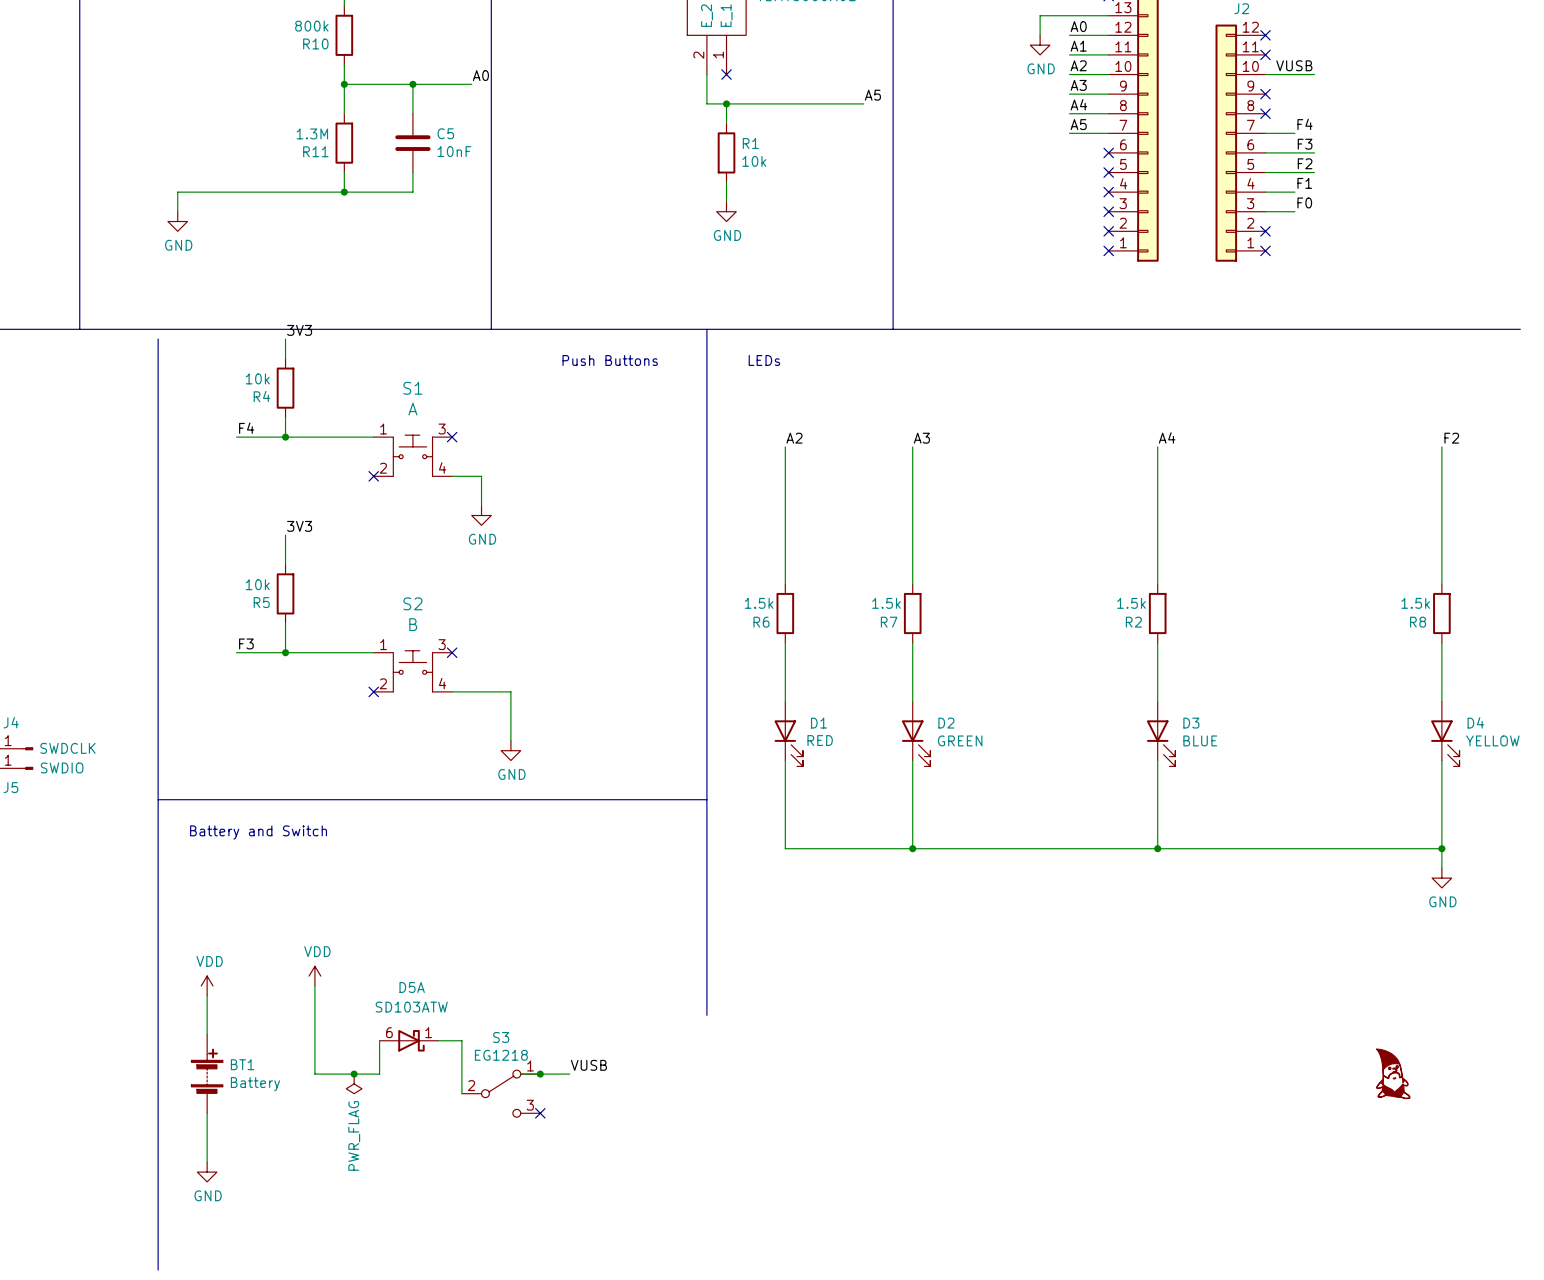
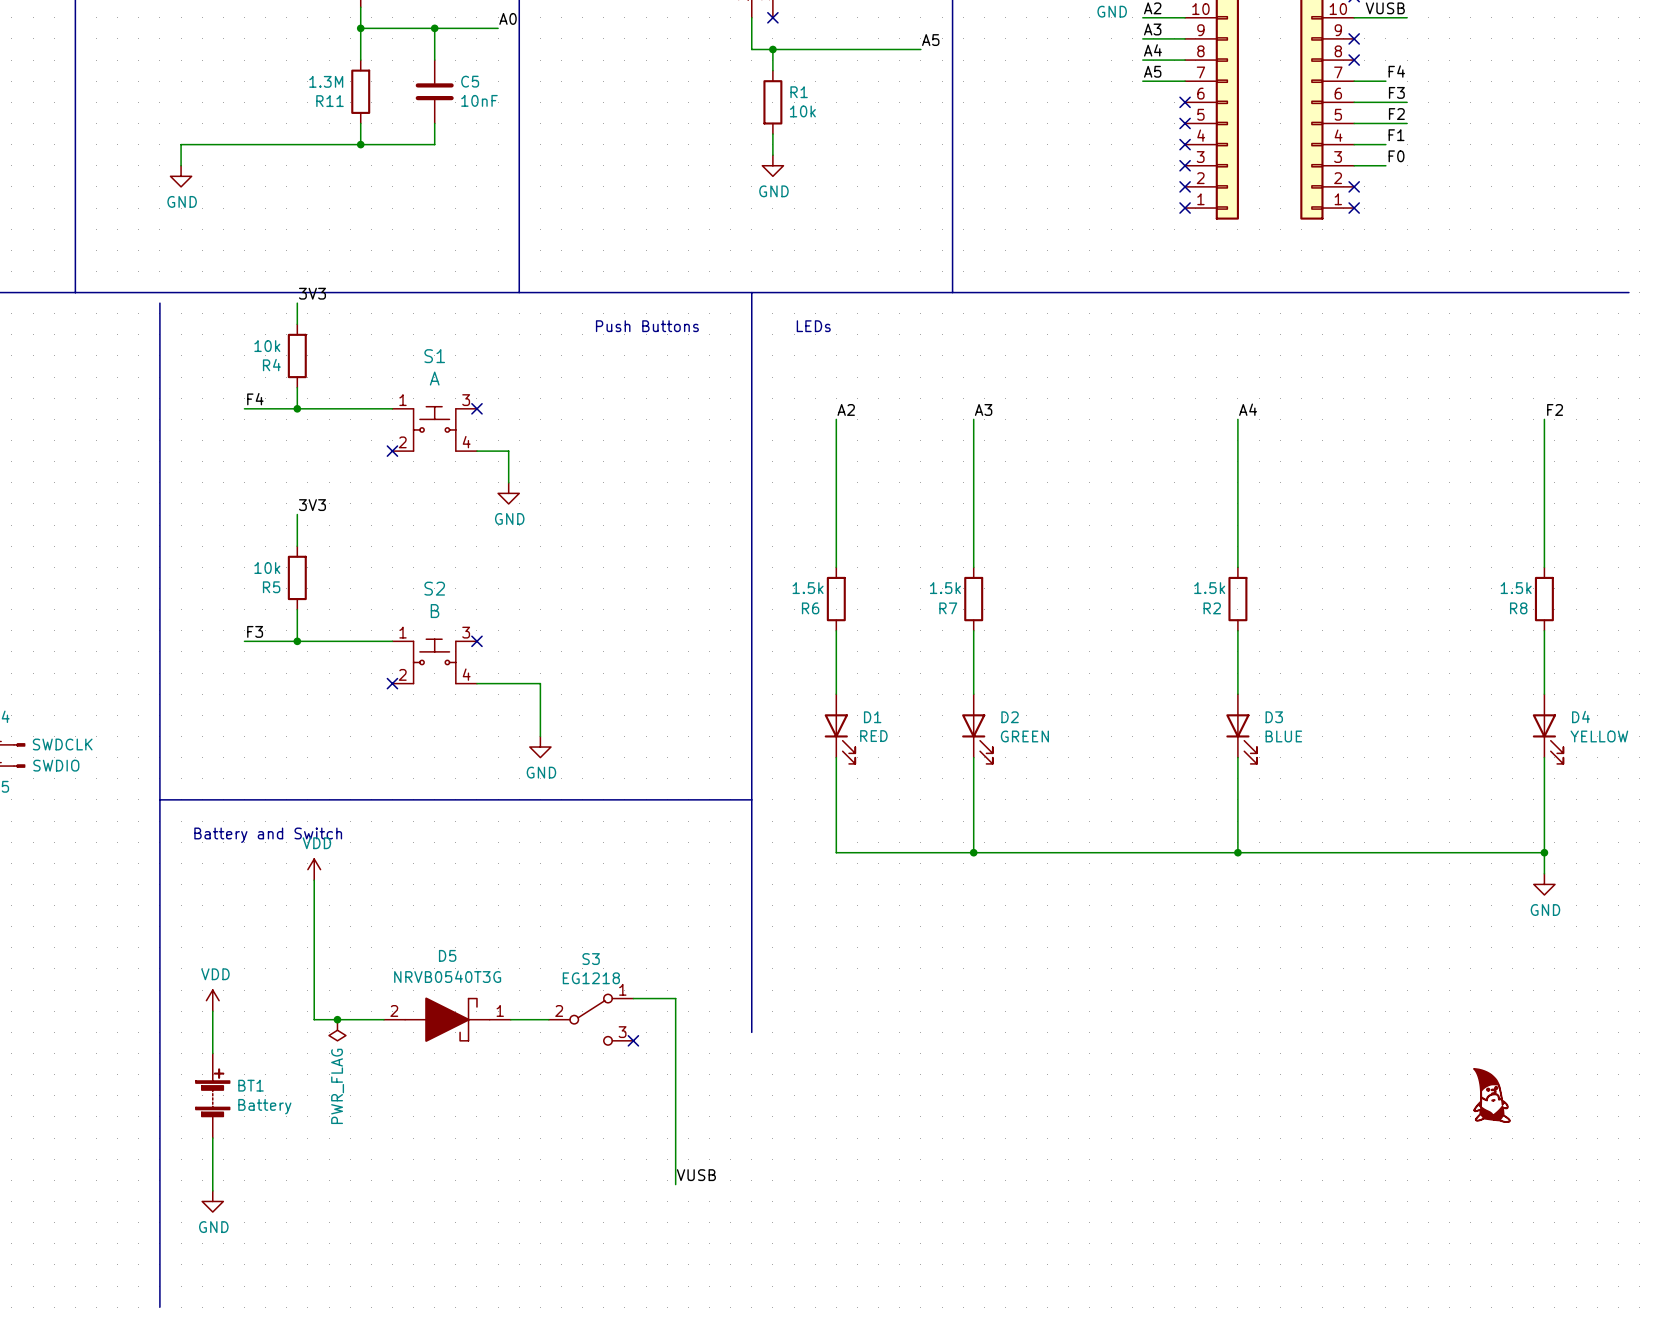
wire: none -> (314, 880) (314, 1019) (383, 1019)
power symbol position: VDD (314, 976) -> VDD (314, 869)
wire: none -> (633, 998) (675, 998) (675, 1184)
wire: (314, 985) (314, 1074) (379, 1074) (379, 1040) -> none
junction: none -> (337, 1019)
D5: none -> NRVB0540T3G (447, 1019)
wire: none -> (510, 1019) (548, 1019)
no-connect mark: none -> (633, 1040)
D5A: SD103ATW (409, 1040) -> none
wire: (438, 1040) (461, 1040) (461, 1093) -> none
label position: VUSB (588, 1065) -> VUSB (696, 1175)
junction: (354, 1074) -> none
wire: (520, 1074) (569, 1074) -> none
junction: (540, 1074) -> none
power symbol position: PWR_FLAG (354, 1083) -> PWR_FLAG (337, 1030)
S3 position: (501, 1093) -> (591, 1019)
no-connect mark: (540, 1113) -> none

